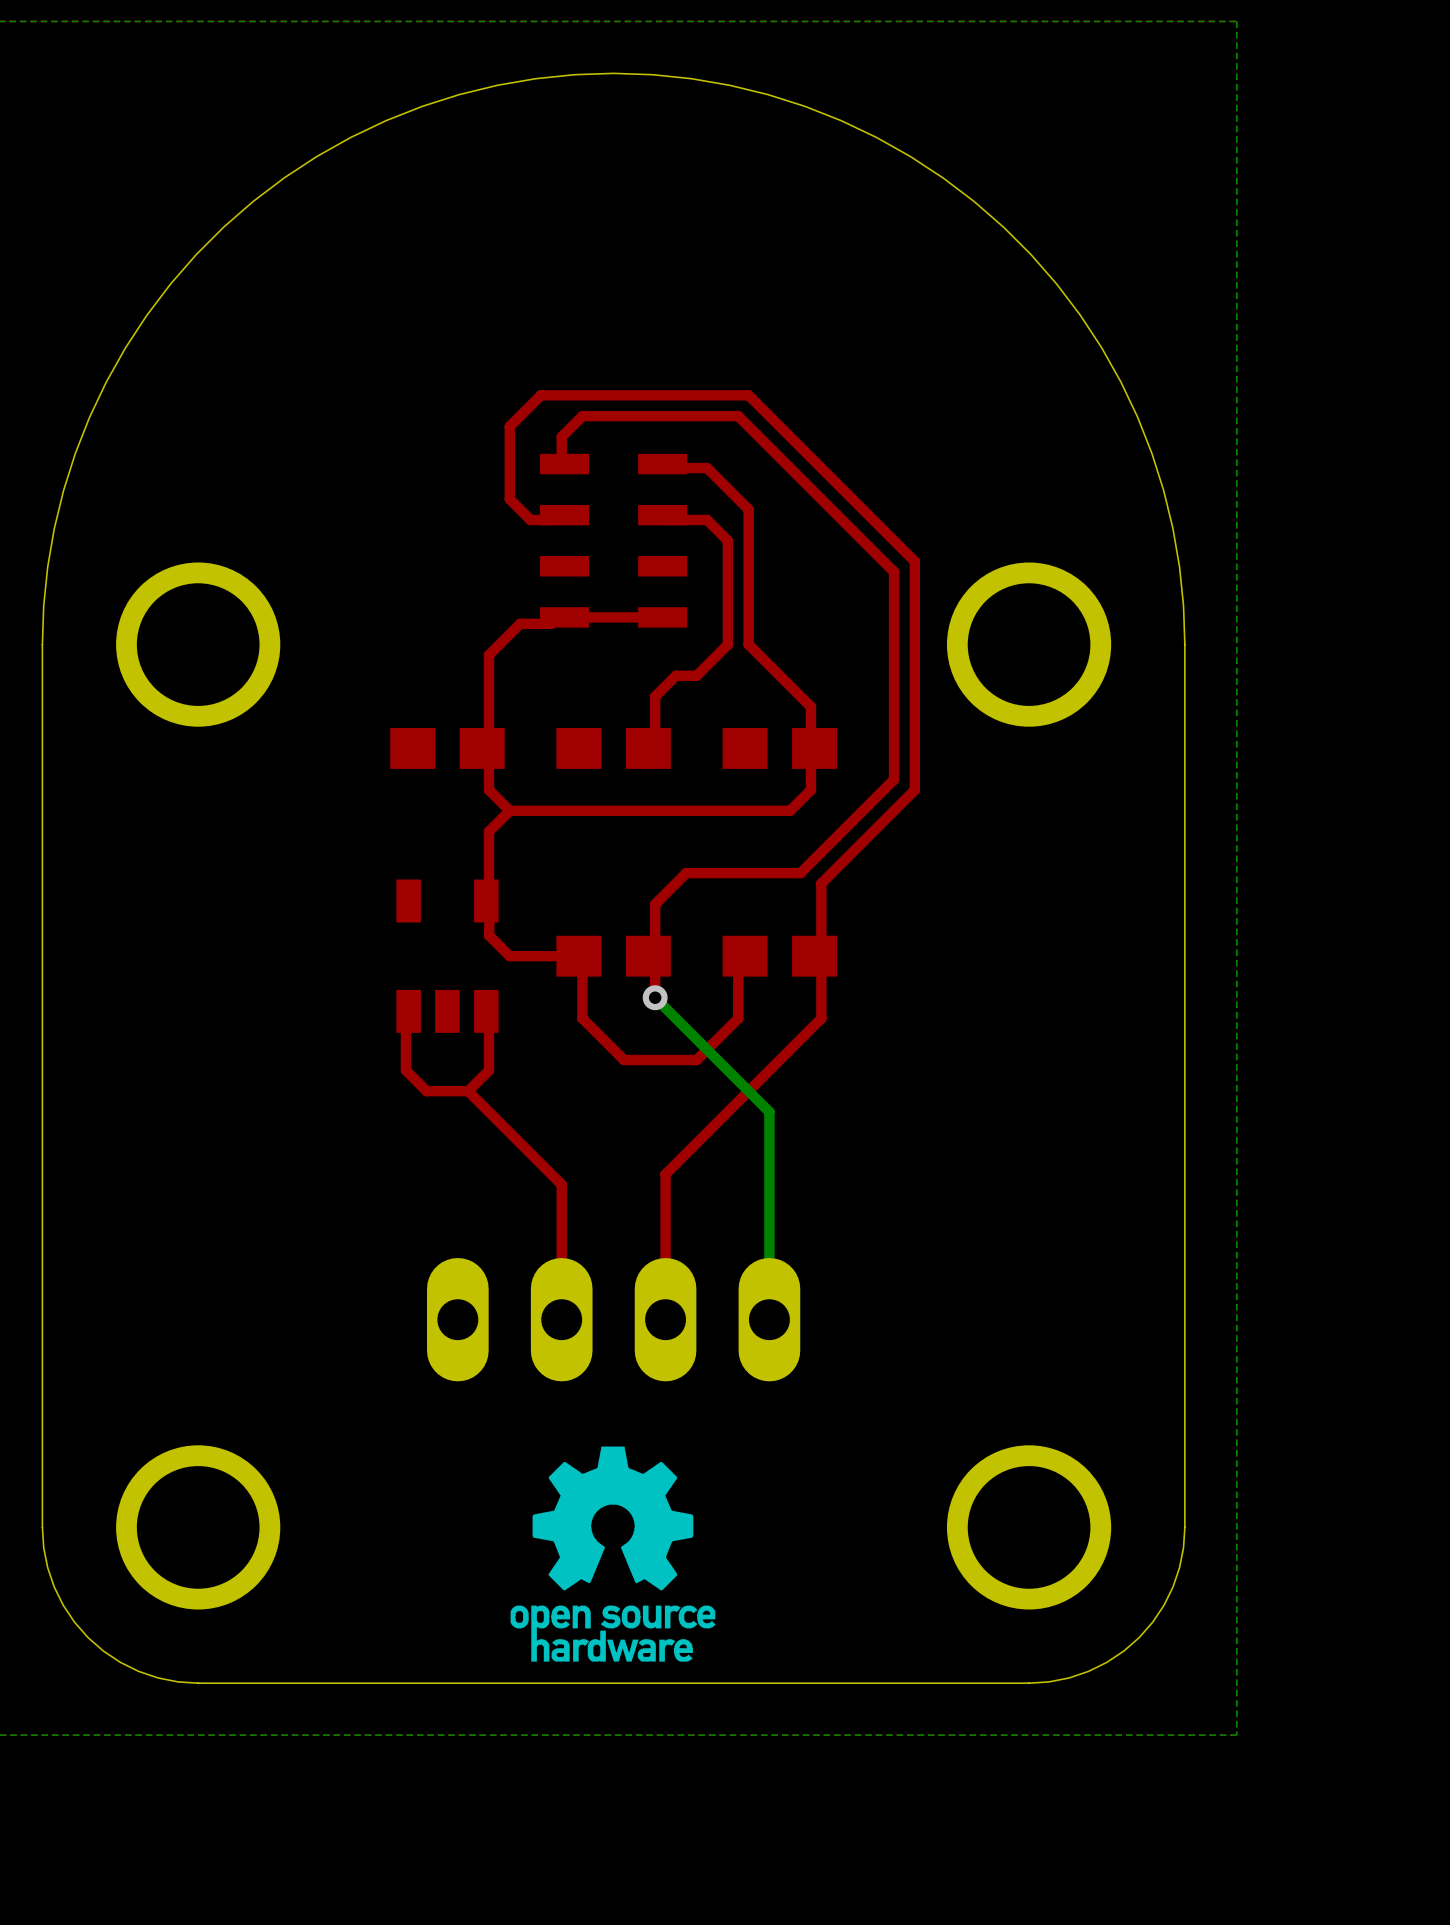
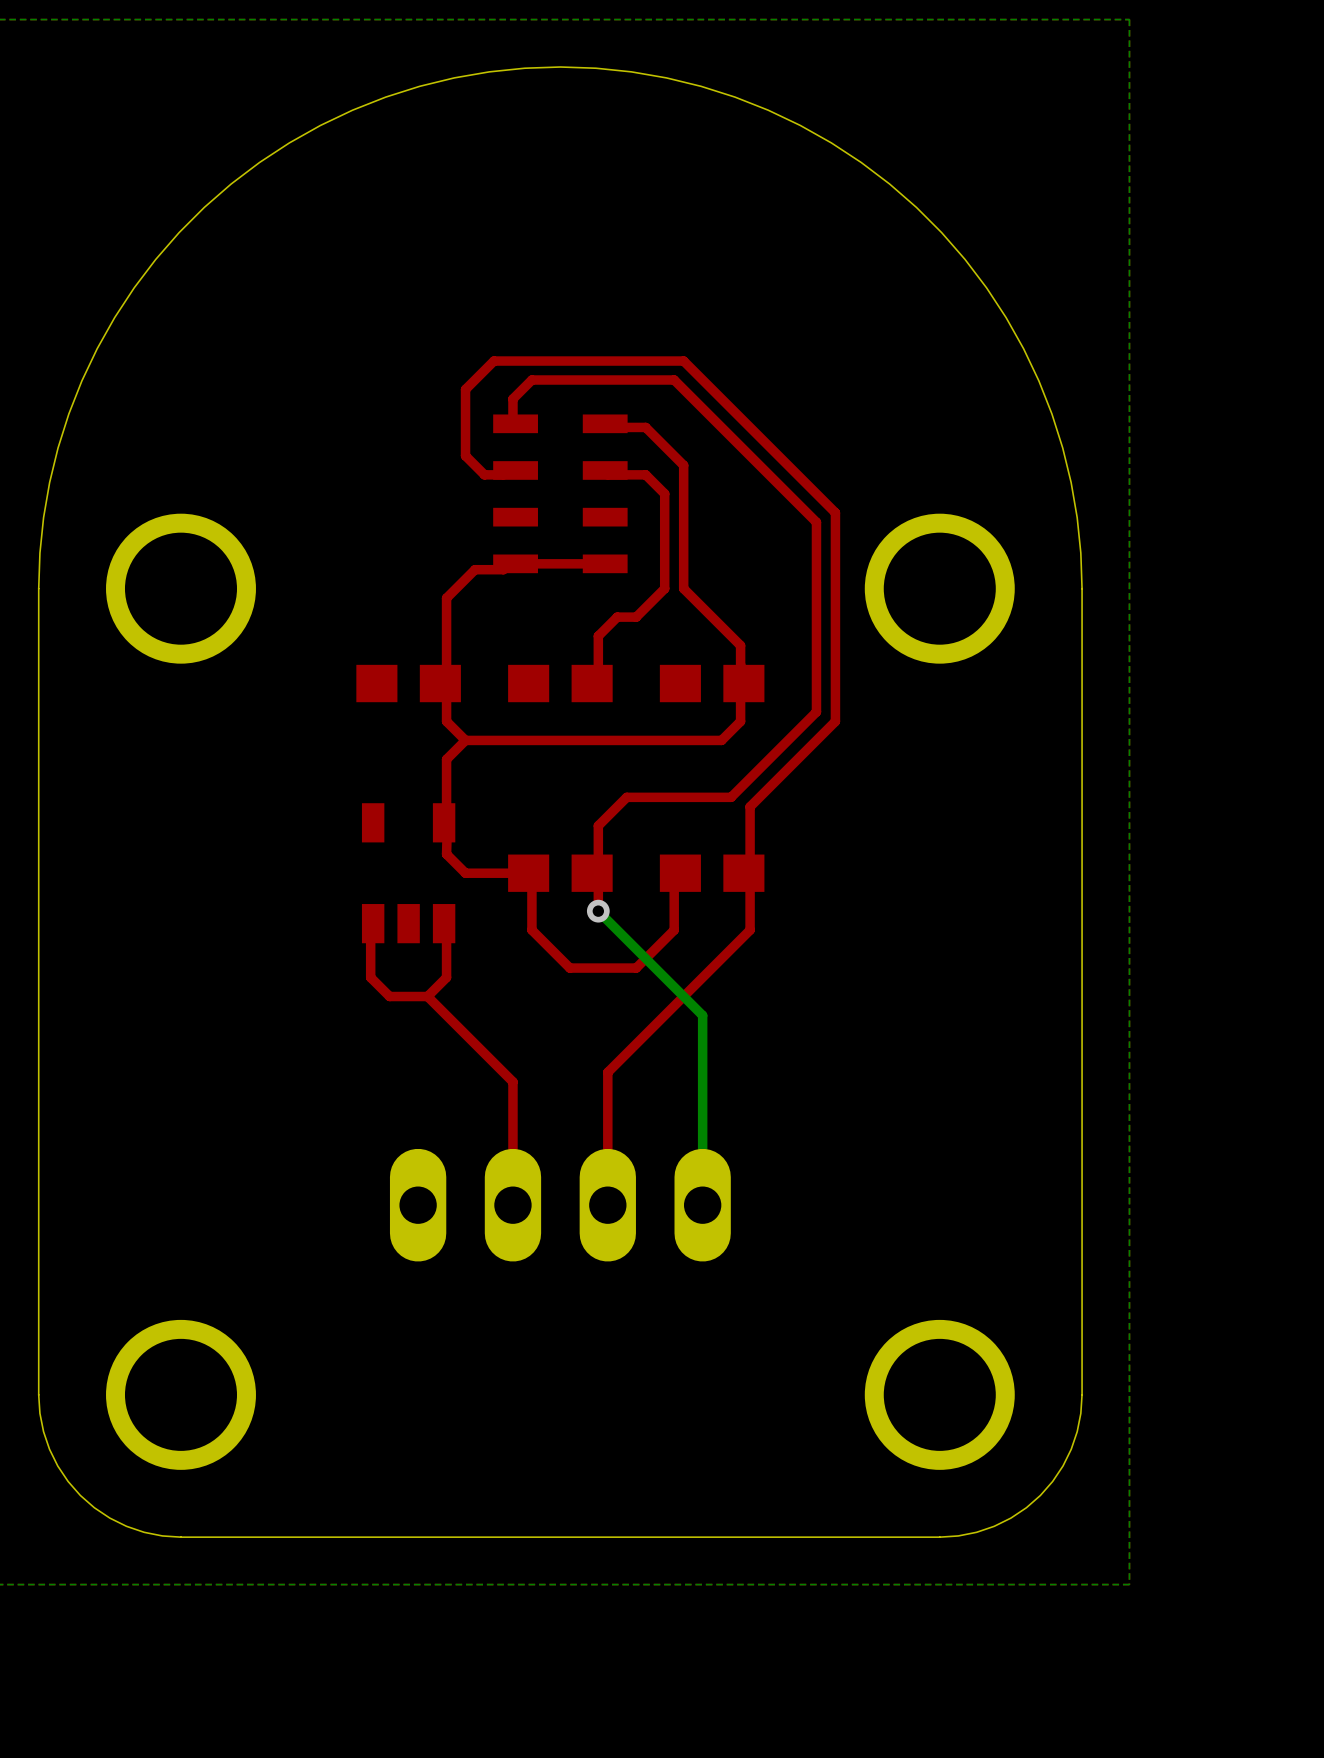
drawing: [510, 1446, 716, 1662] -> none

